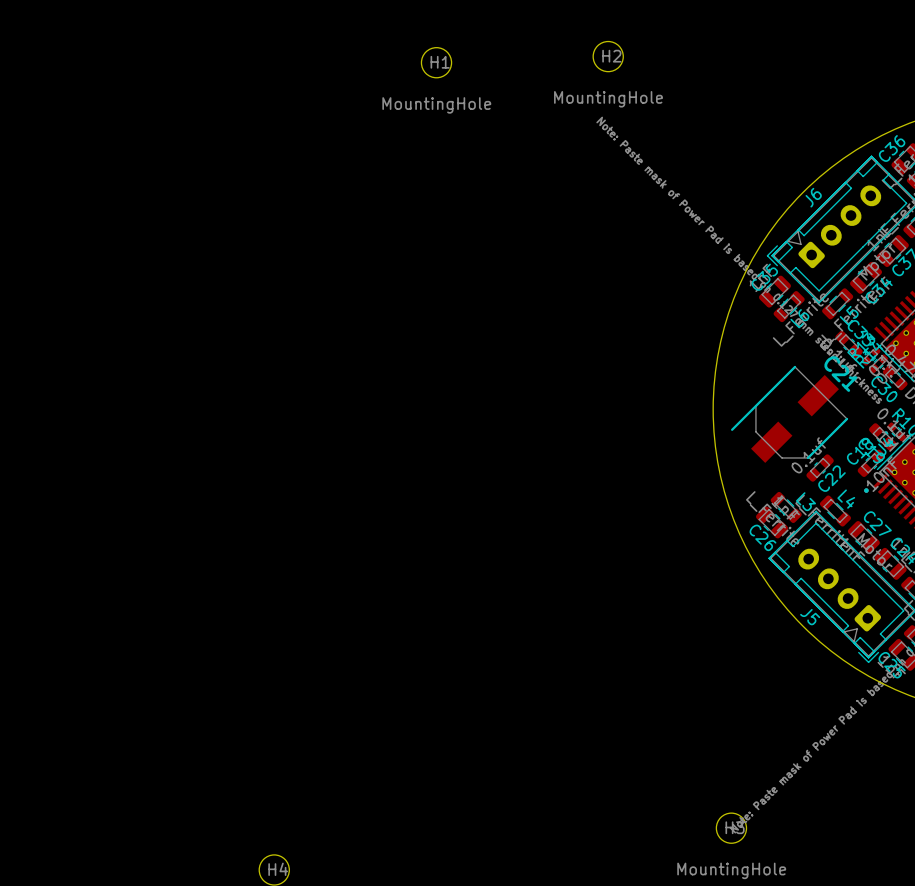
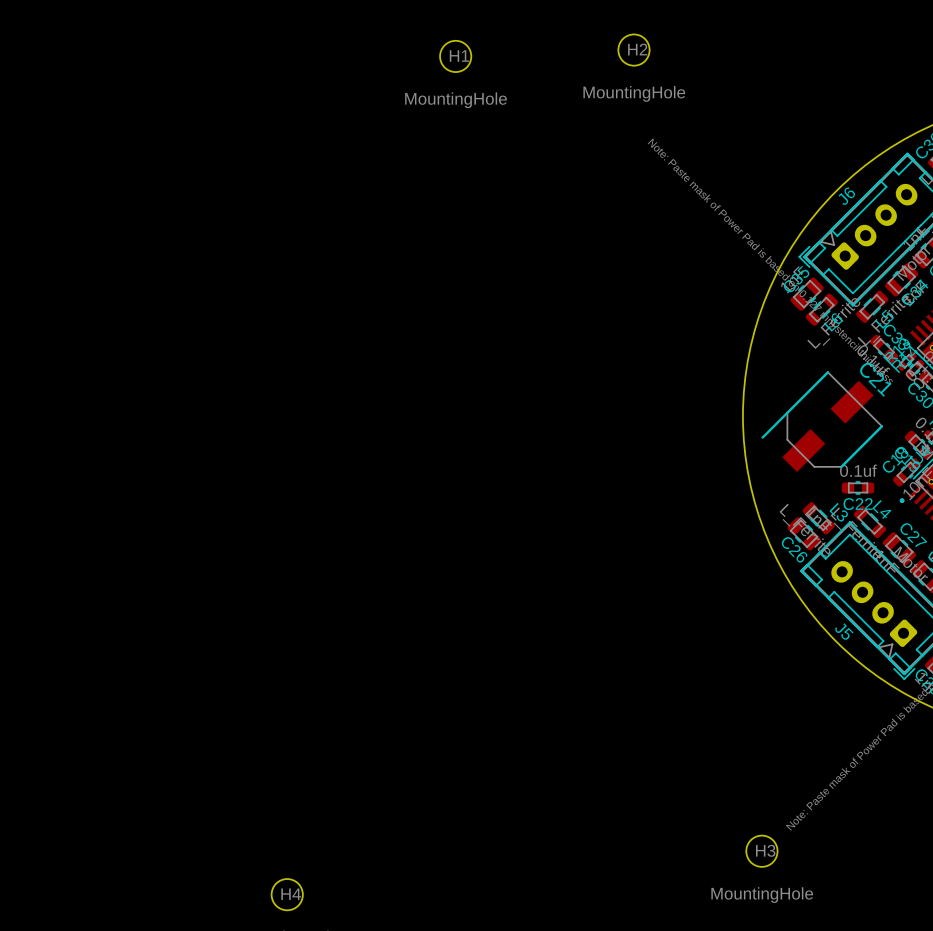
C22 rotation: 0° (820, 468) -> 45° clockwise (858, 487)

